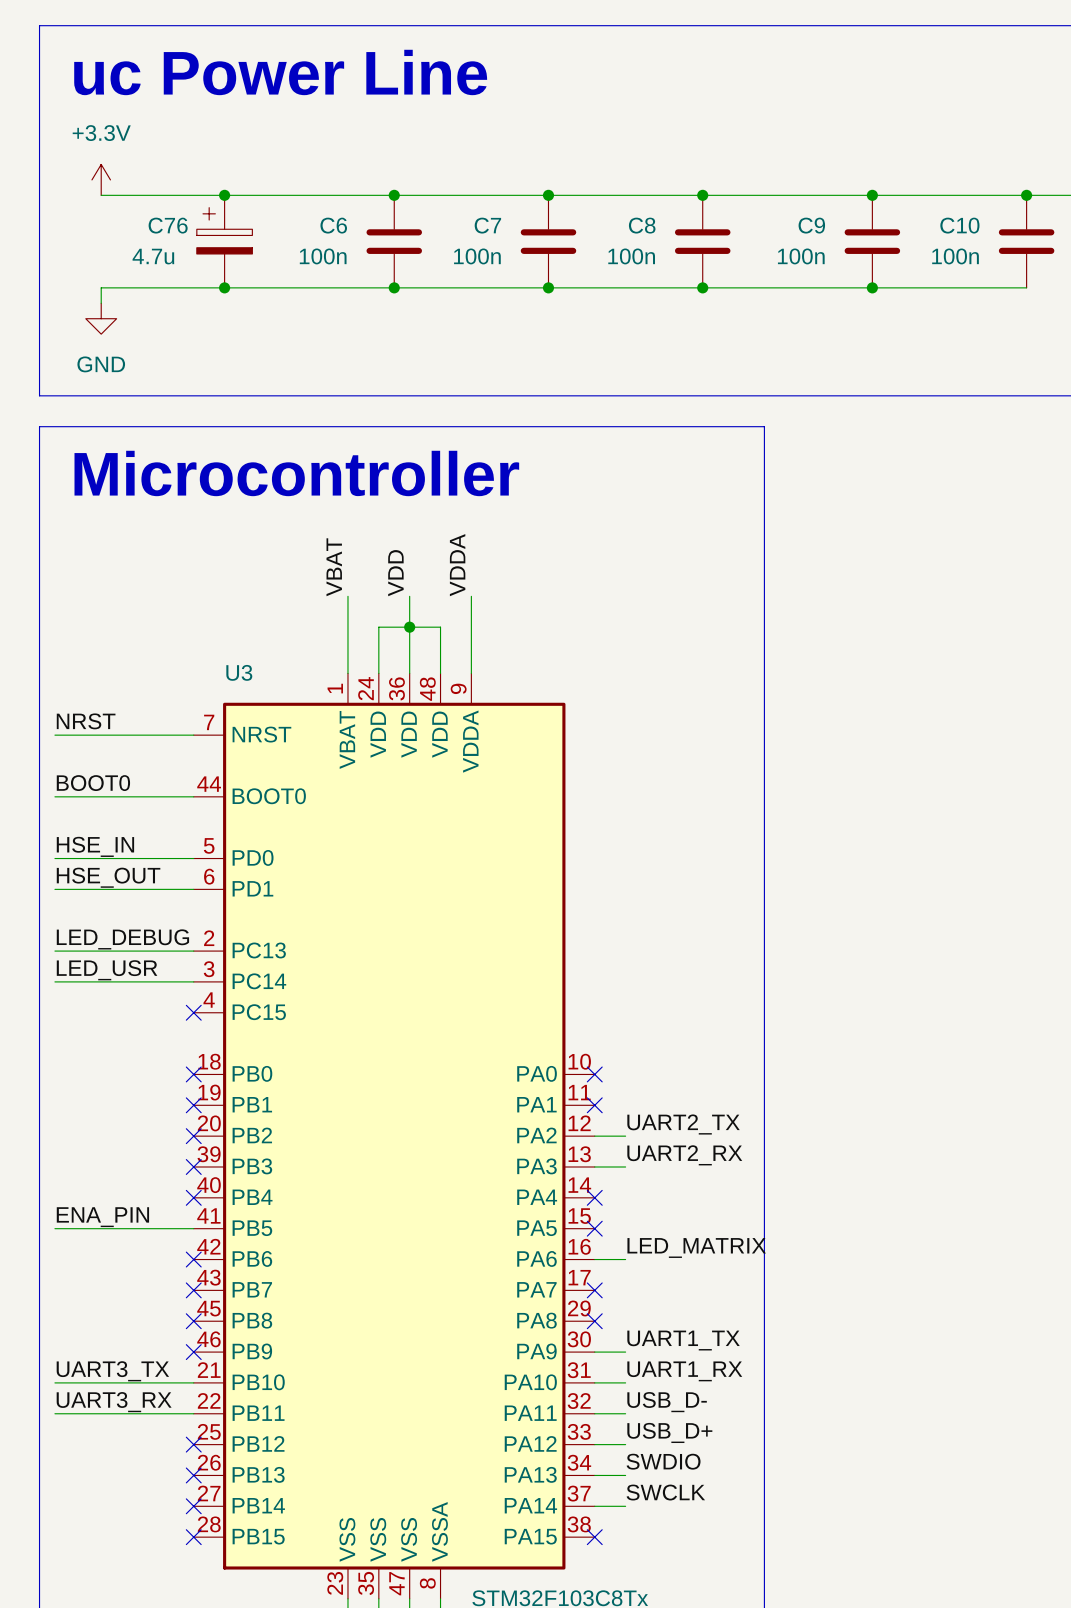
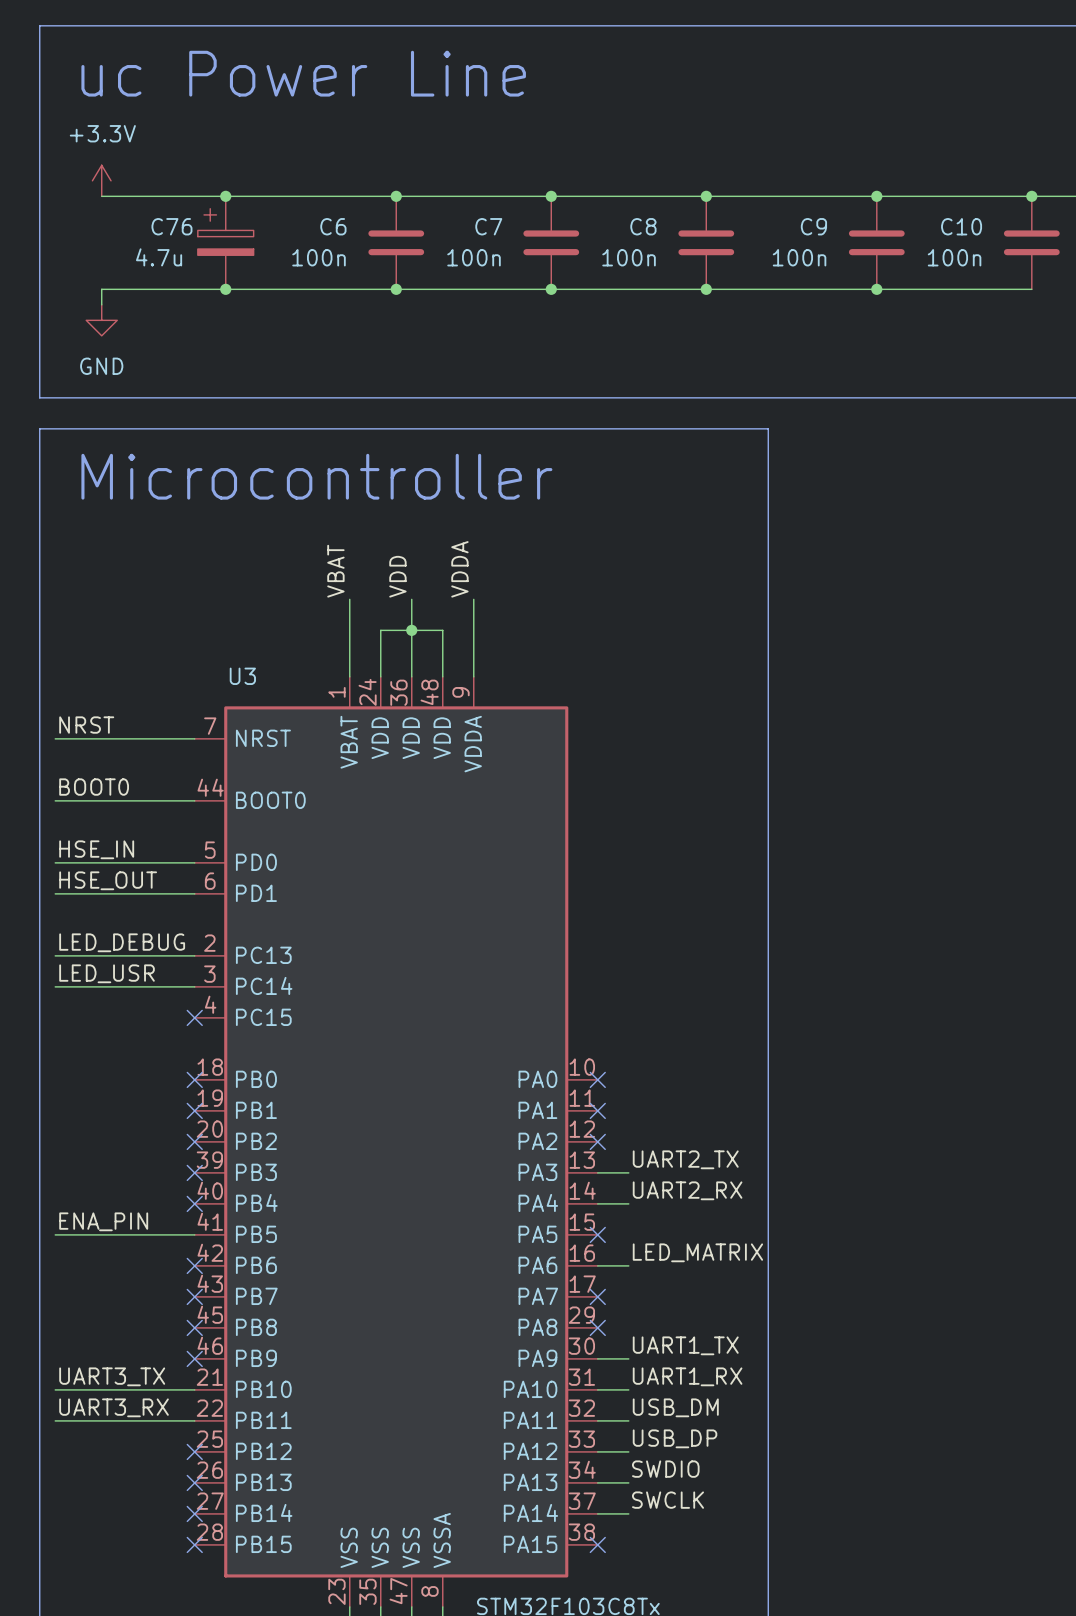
label: UART2_TX (683, 1124) -> none
wire: (594, 1136) (625, 1136) -> (597, 1203) (628, 1203)
label: UART2_RX (684, 1155) -> UART2_TX (685, 1159)
label: none -> UART2_RX (687, 1190)
no-connect mark position: (594, 1197) -> (597, 1141)
label: USB_D- (667, 1402) -> USB_DM (675, 1407)
label: USB_D+ (669, 1432) -> USB_DP (675, 1438)

